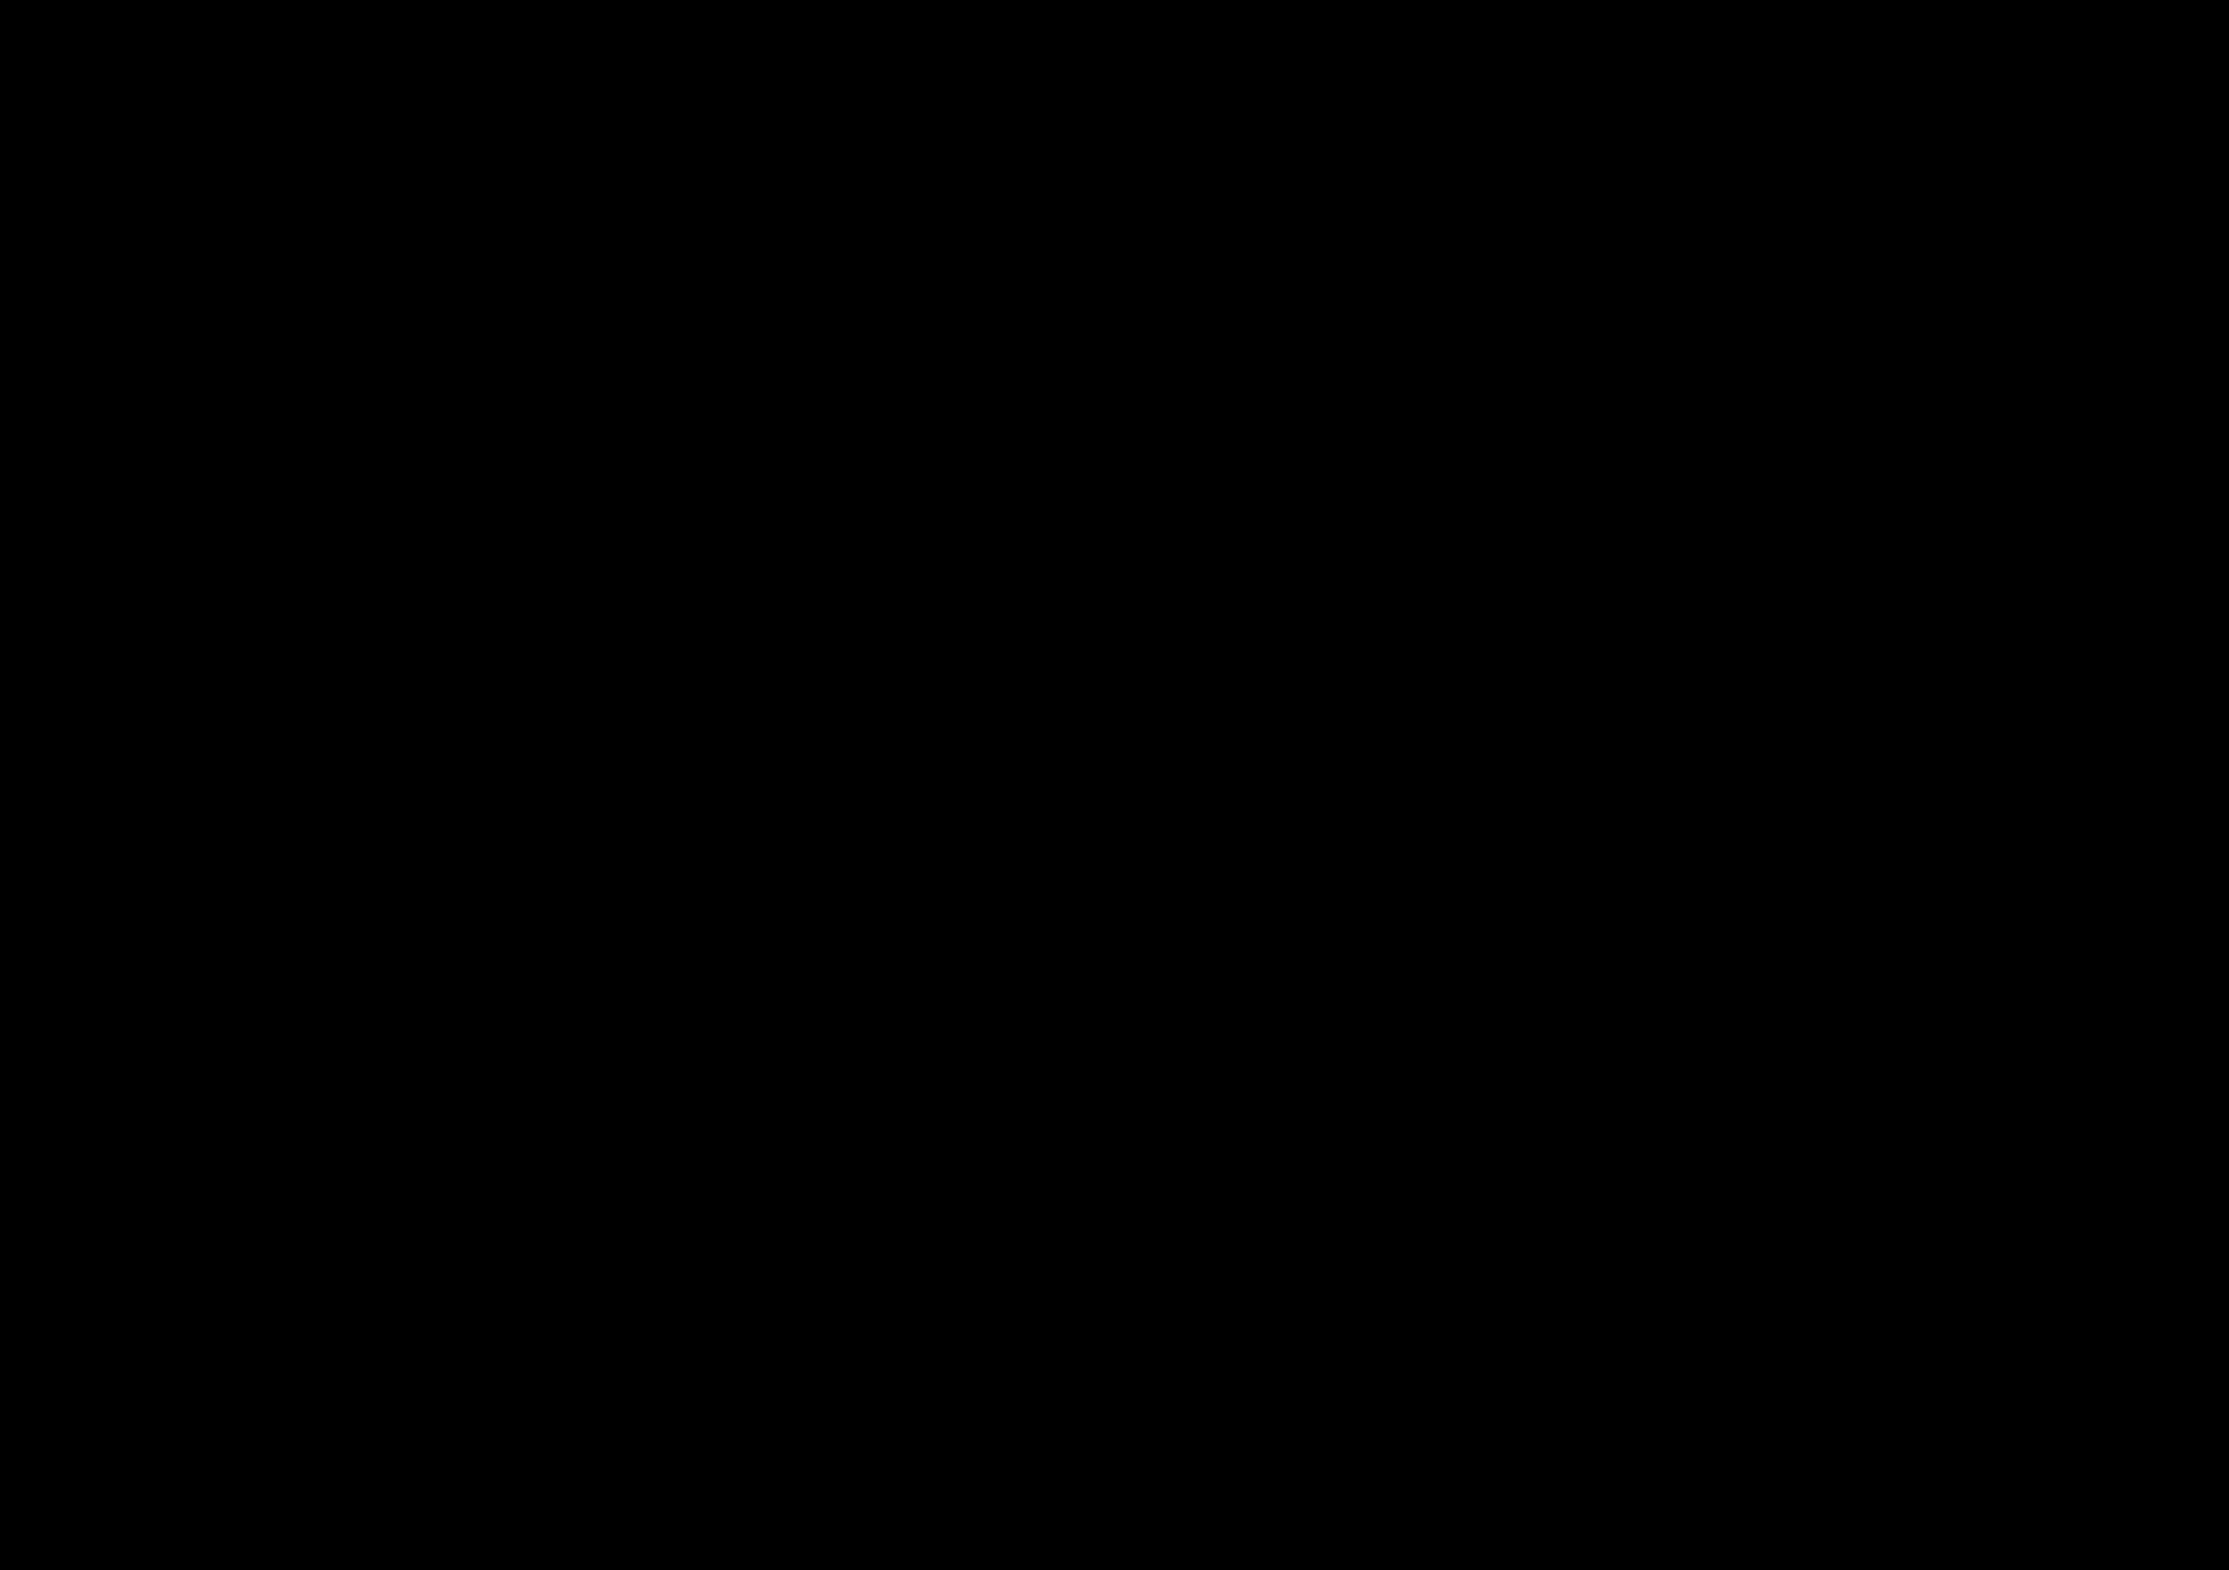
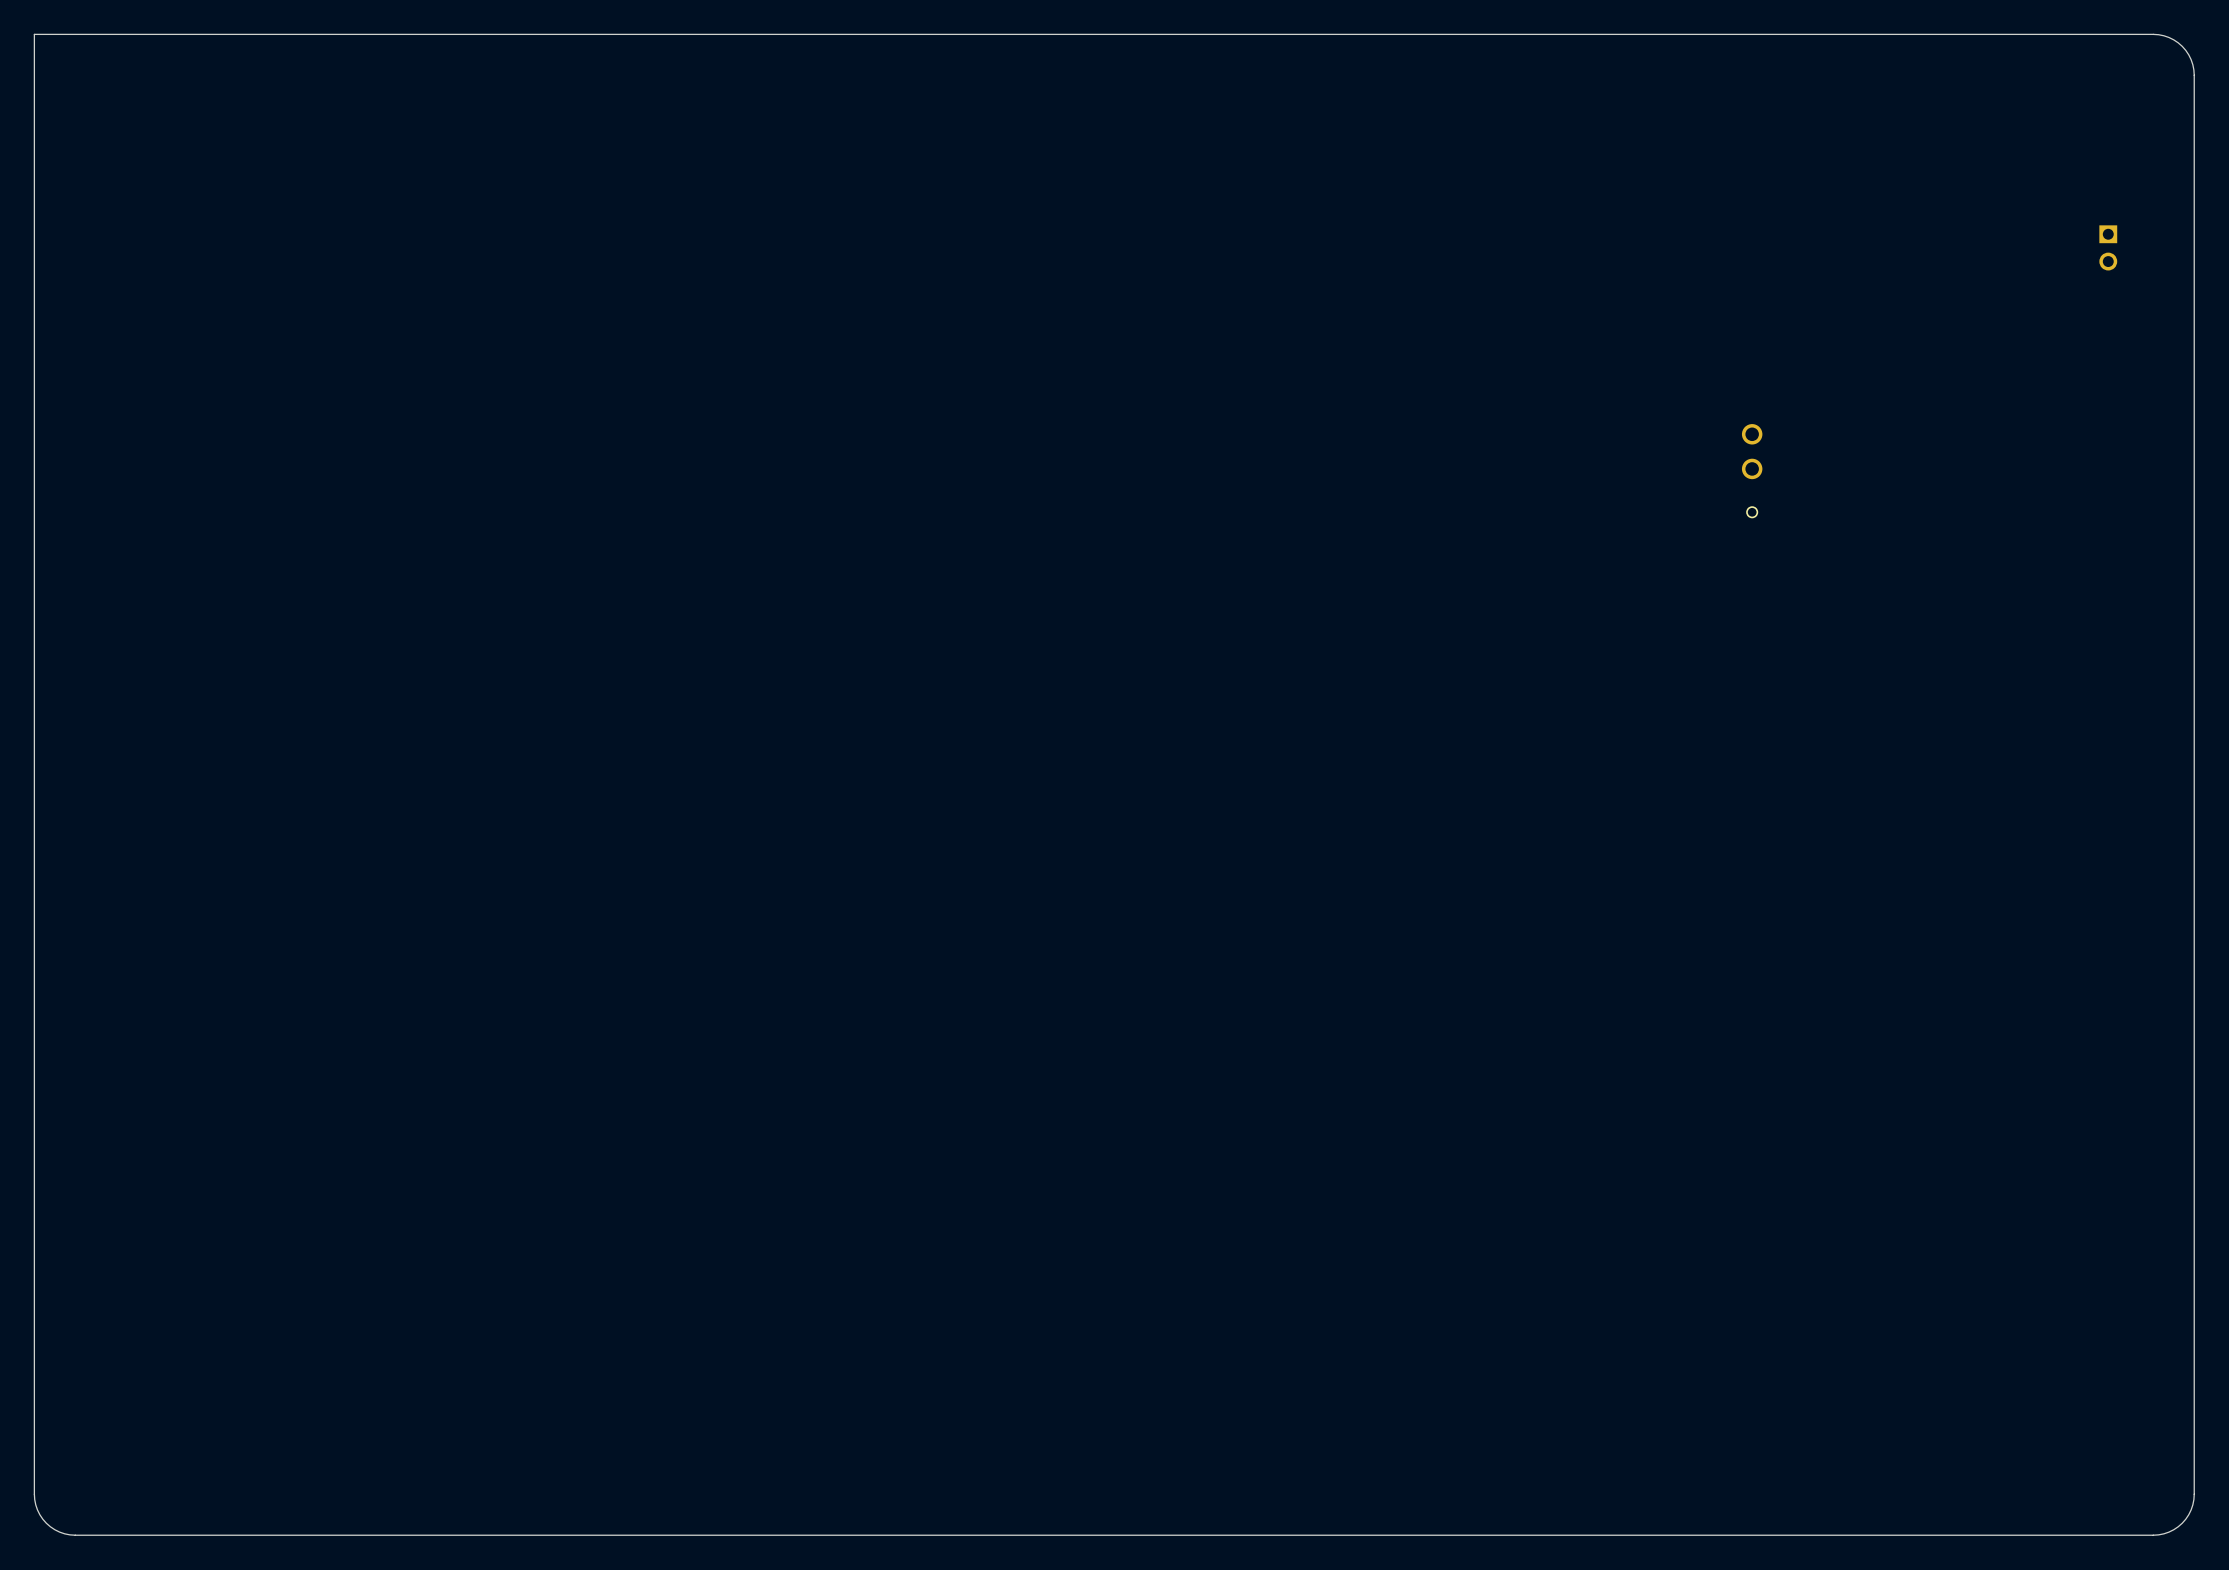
board edge: none -> (2153, 34) (34, 34) (34, 1494) (37, 1509) (42, 1519) (59, 1532) (75, 1535) (2153, 1535) (2168, 1532) (2178, 1526) (2188, 1514) (2194, 1494) (2194, 75) (2191, 59) (2182, 46) (2168, 37) (2153, 34)
part: none -> (2108, 247)
part: none -> (1752, 471)

